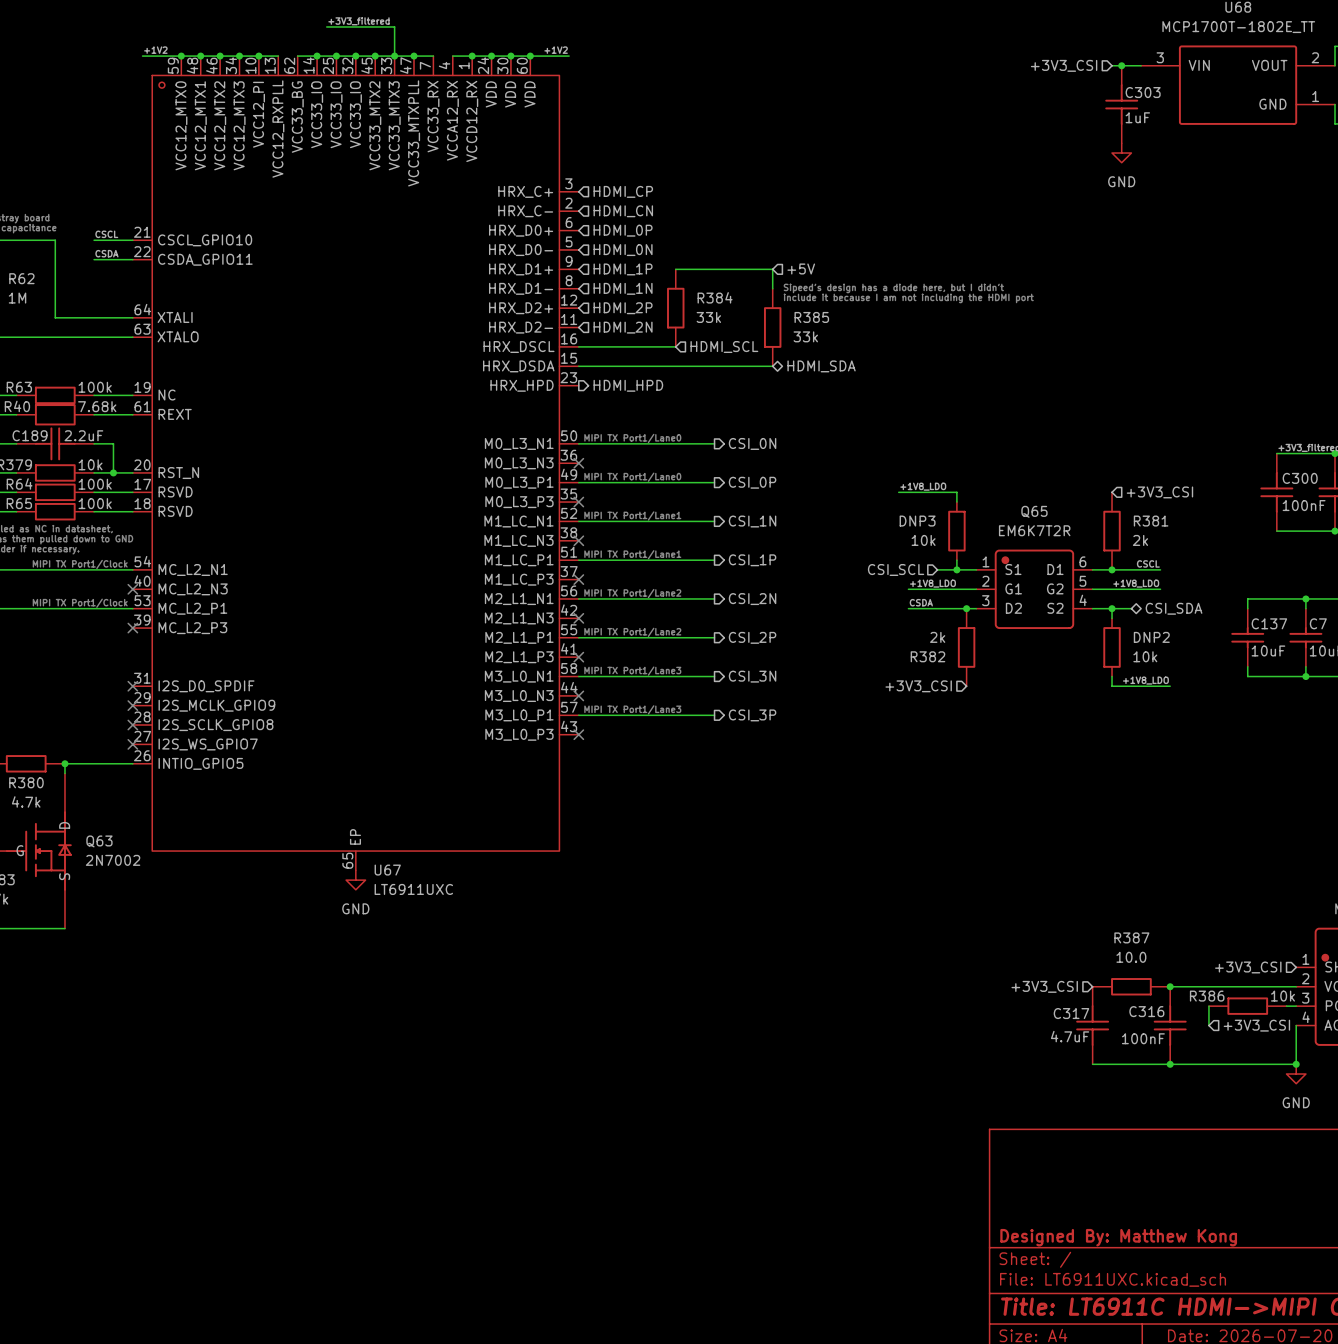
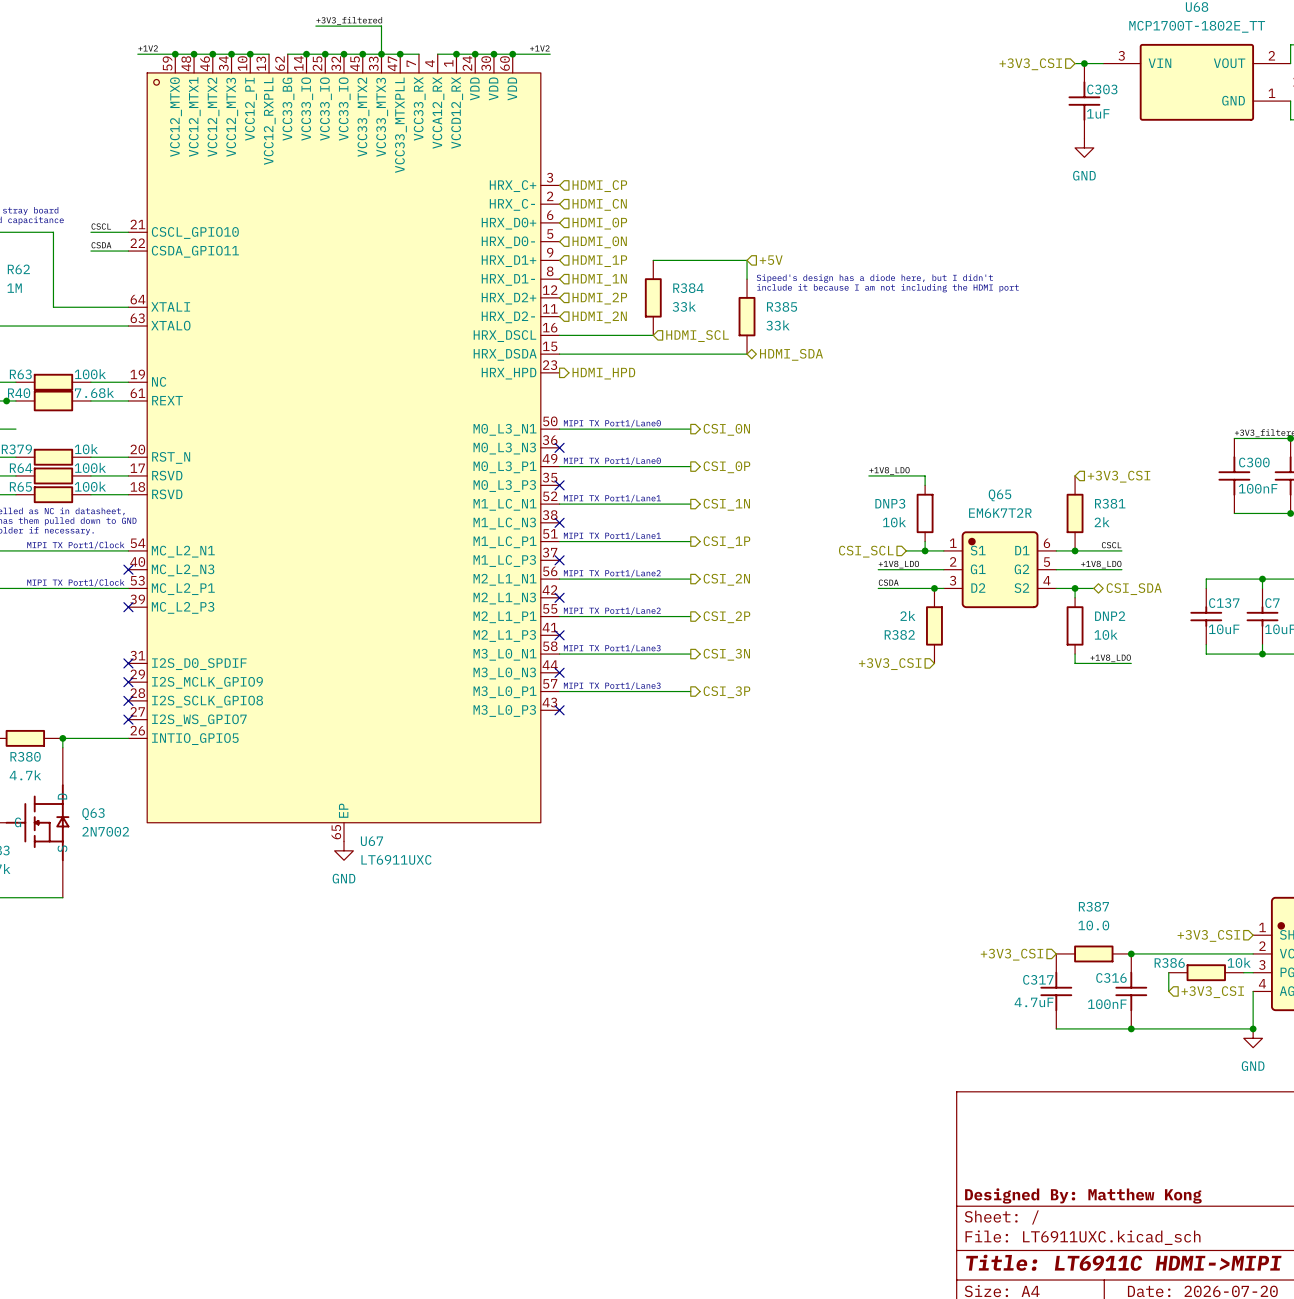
junction: none -> (6, 400)
C189: 2.2uF (55, 443) -> none
wire: (94, 443) (113, 443) (113, 472) -> none
junction: (113, 472) -> none

